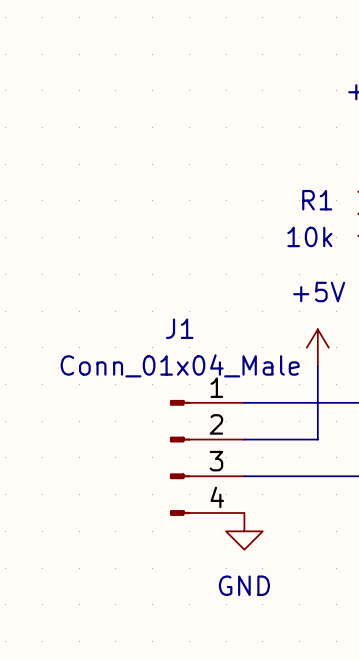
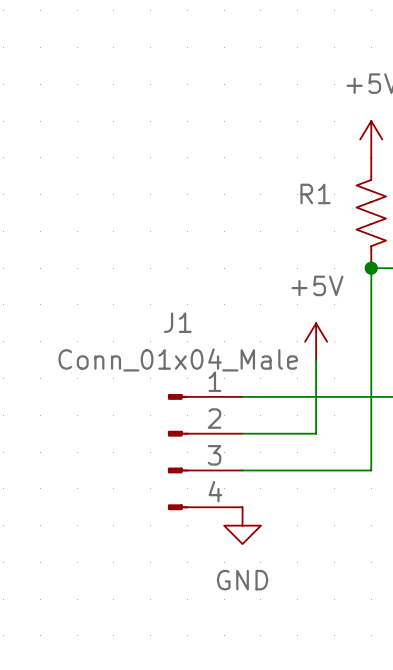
R1 value: 10k (309, 236) -> none

